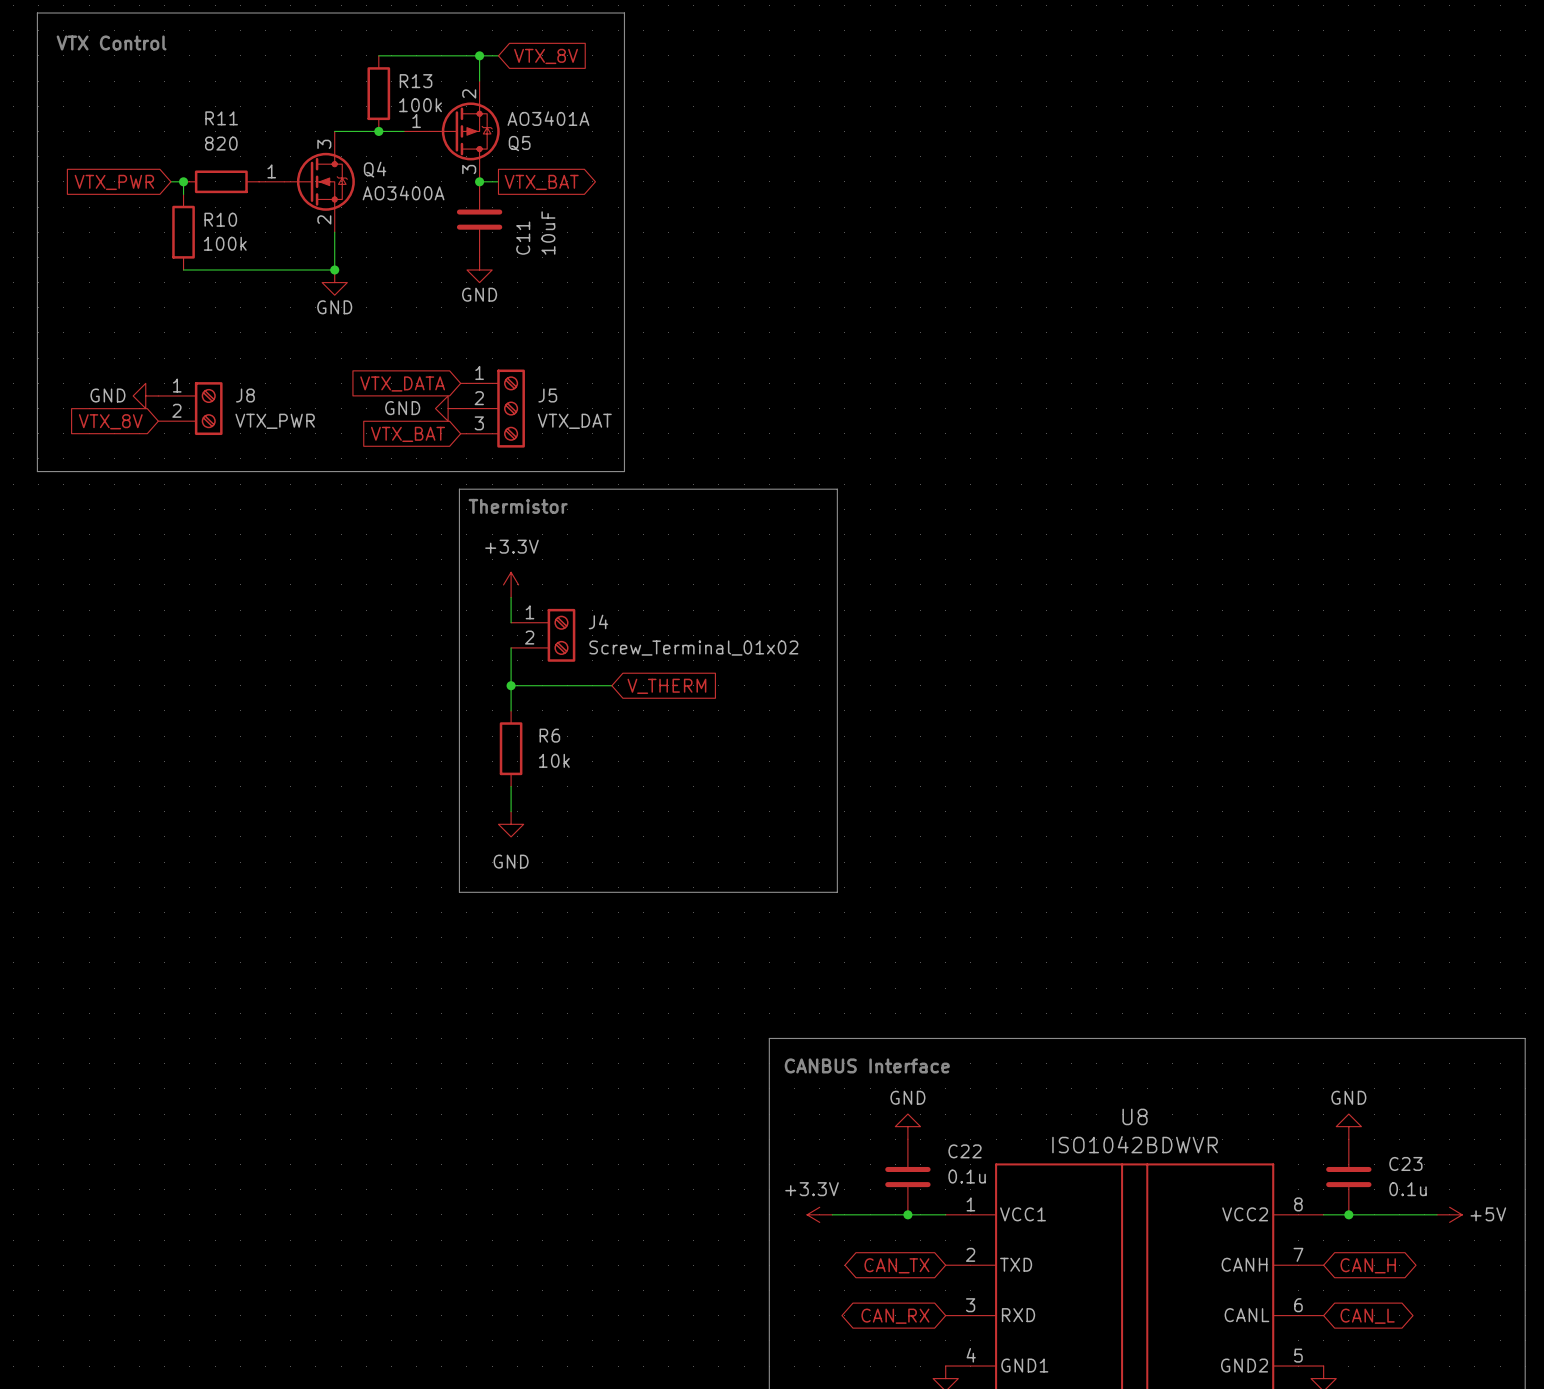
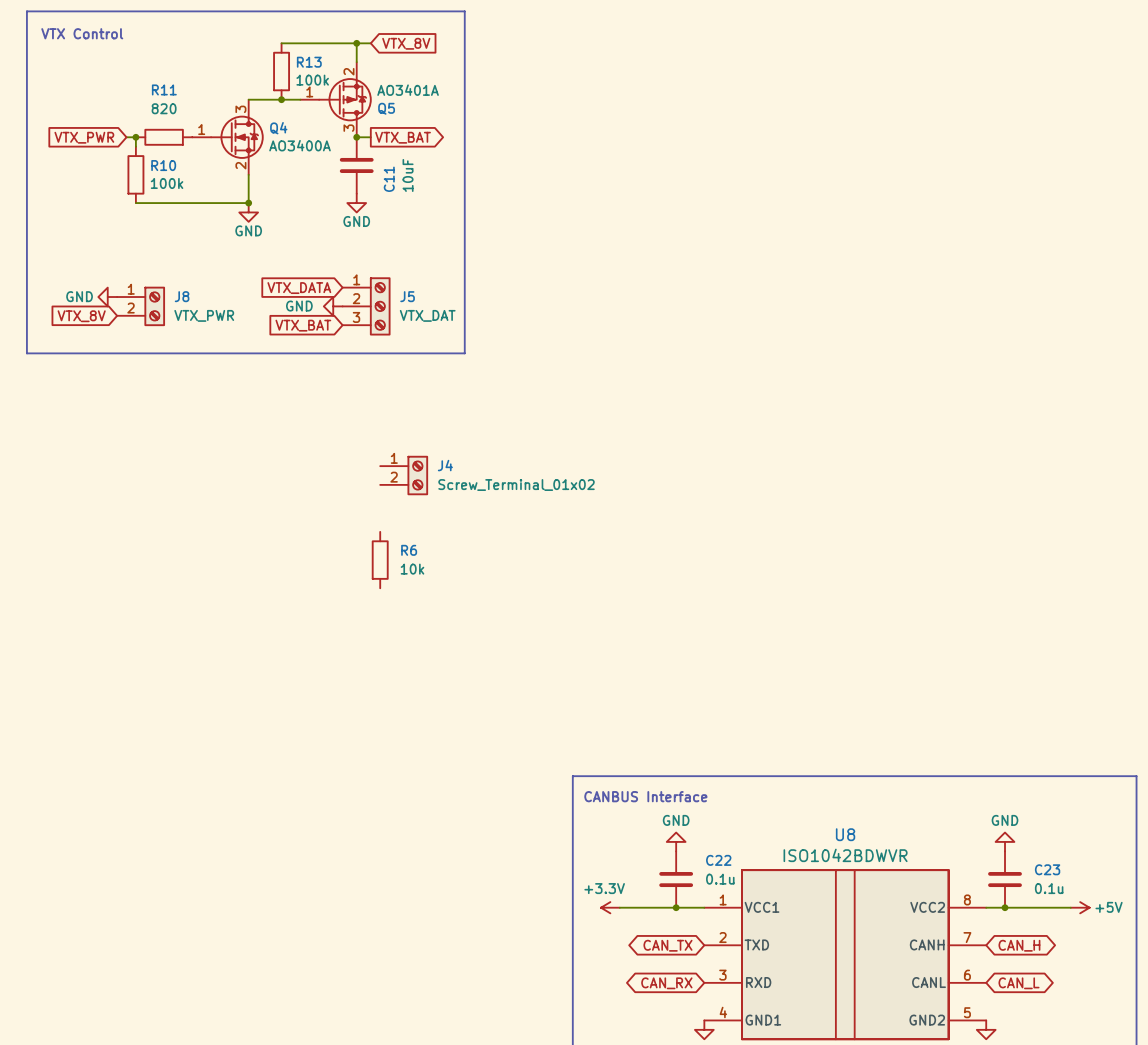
line: (459, 489) (837, 489) (837, 892) (459, 892) (459, 489) -> none
text: Thermistor (518, 506) -> none
power symbol: +3.3V (511, 584) -> none
wire: (511, 597) (511, 622) -> none
wire: (511, 647) (511, 710) -> none
wire: (511, 685) (611, 685) -> none
junction: (511, 685) -> none
global label: V_THERM (666, 686) -> none
wire: (511, 786) (511, 811) -> none
power symbol: GND (511, 824) -> none

